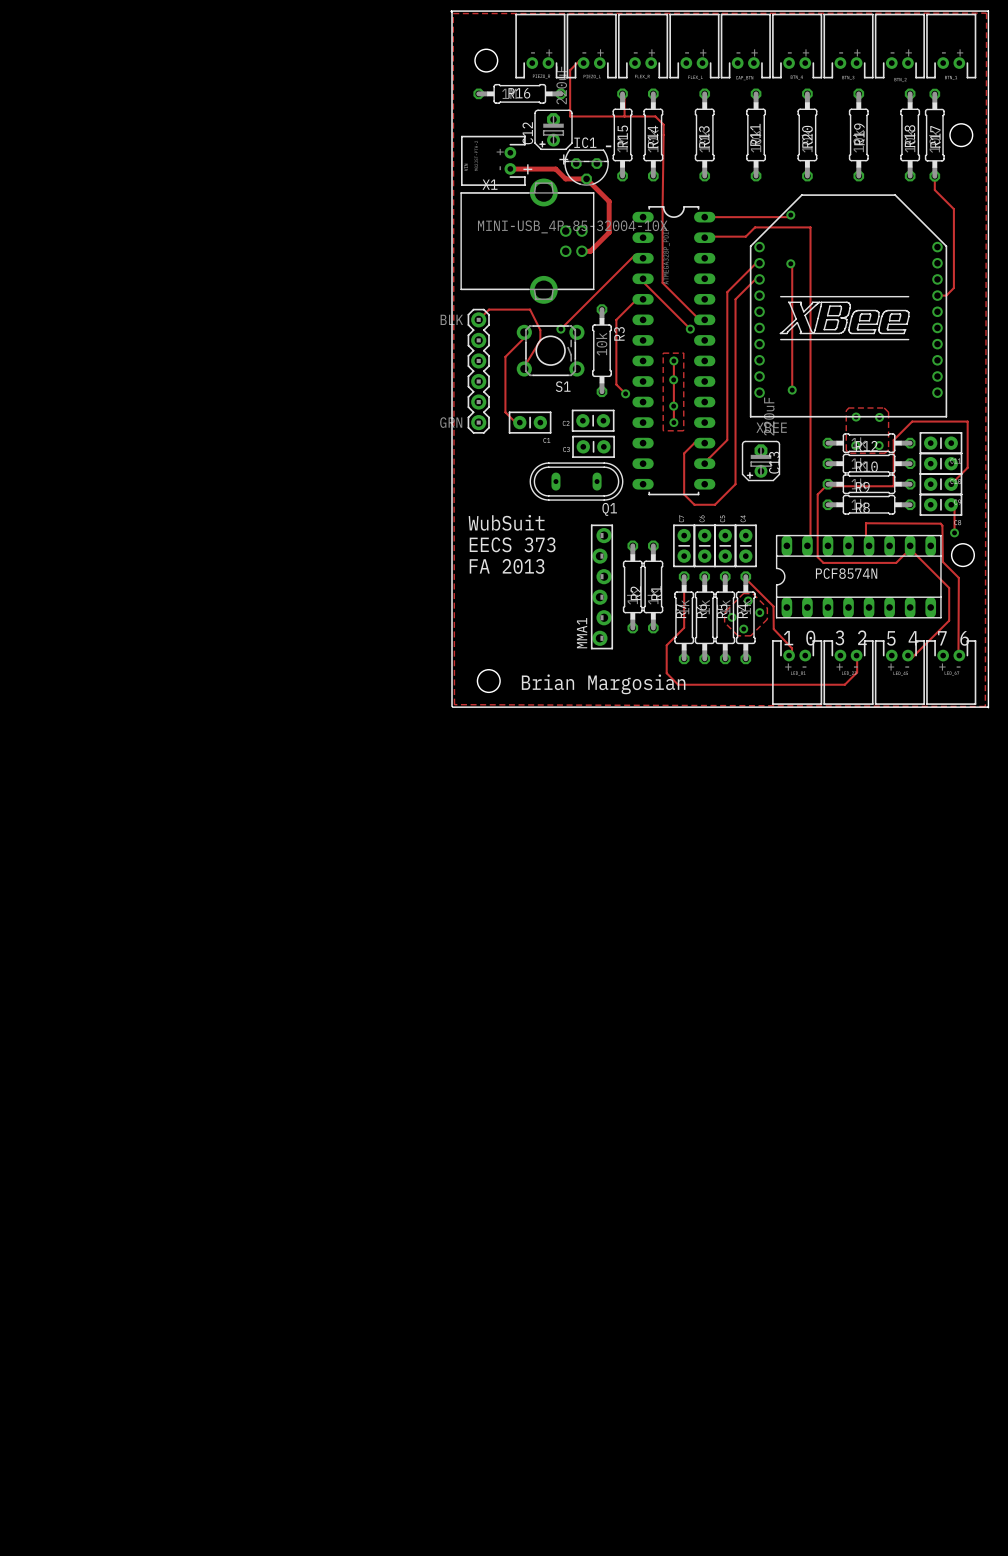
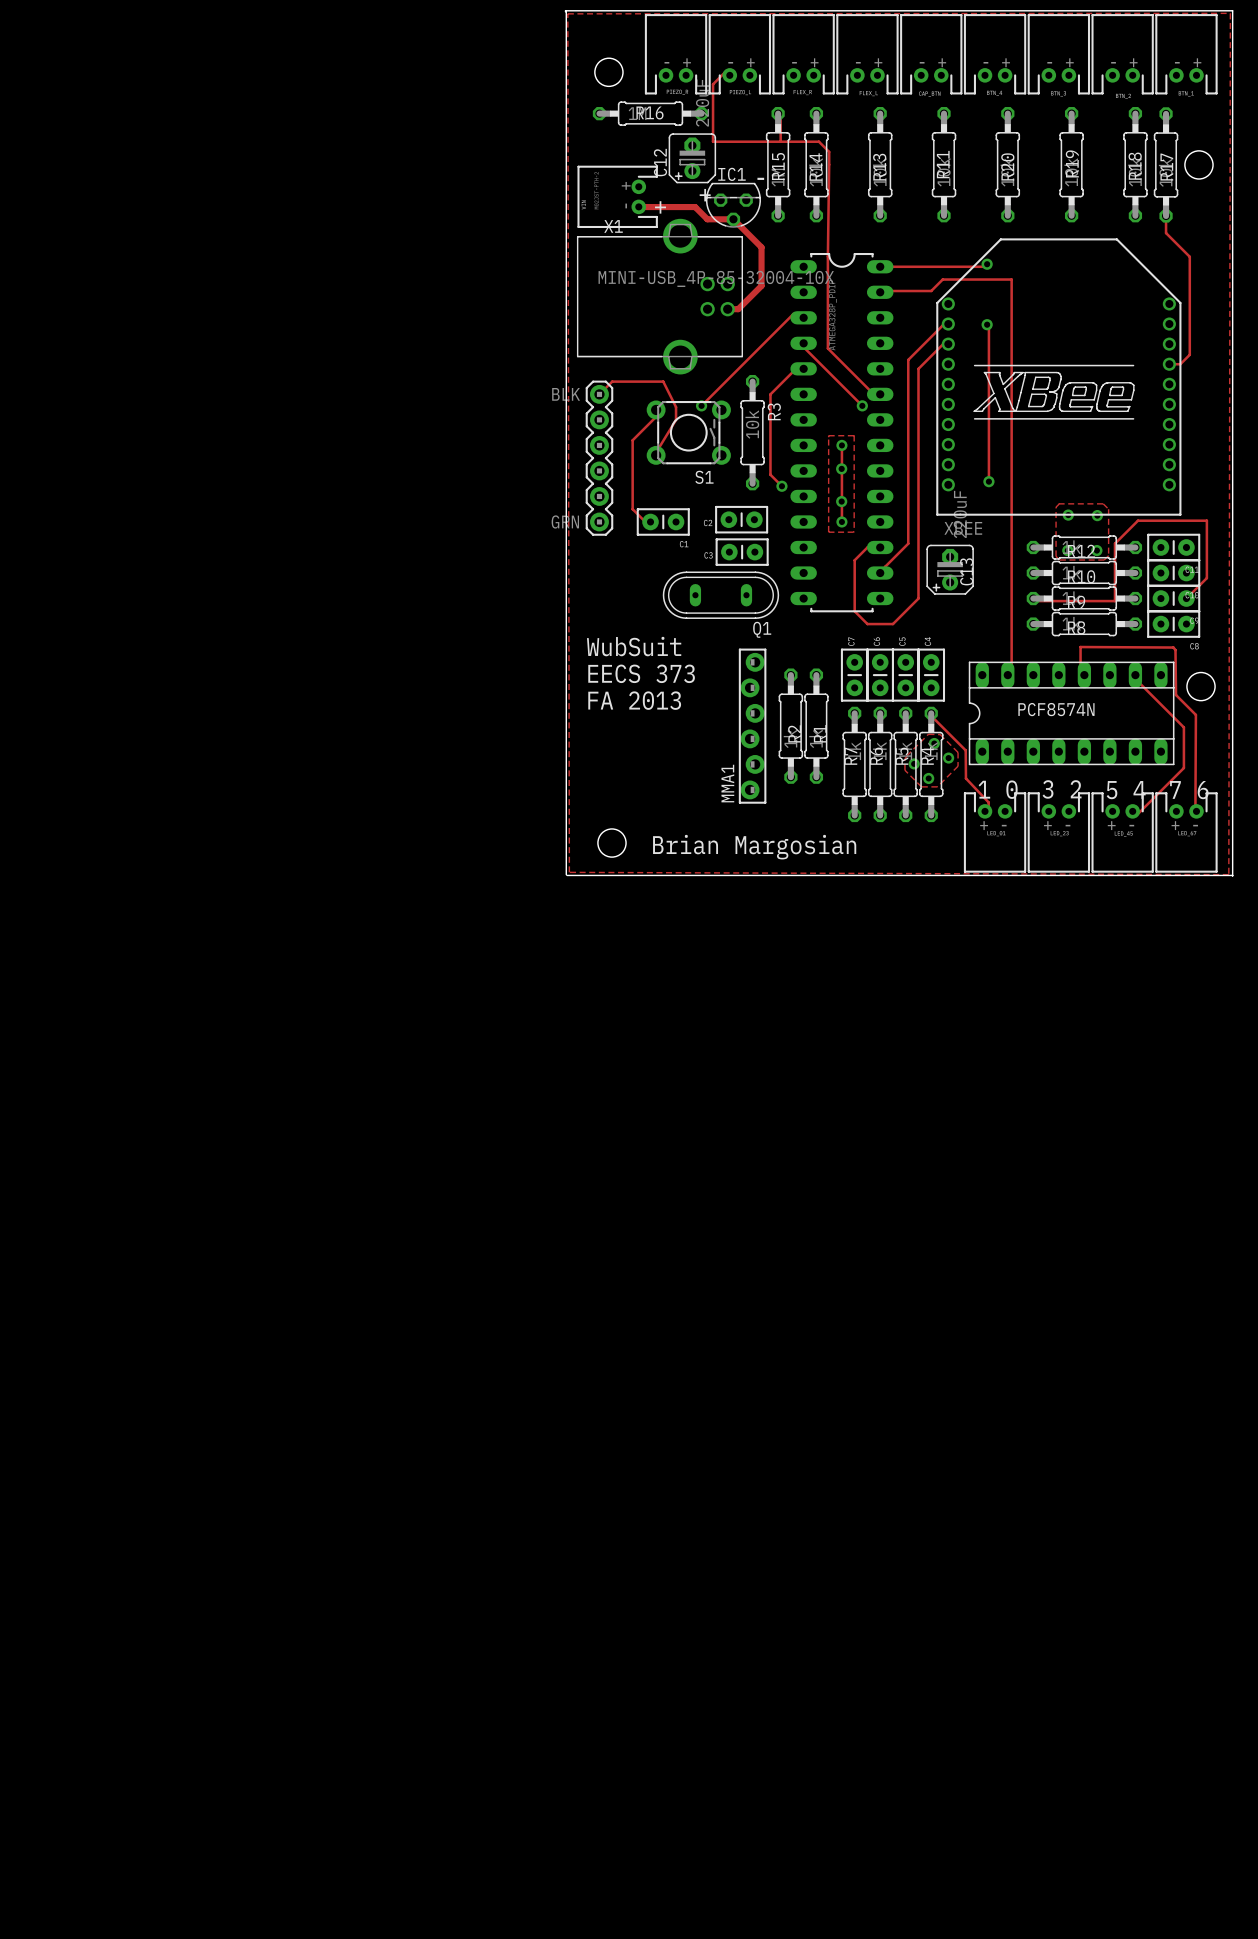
track: (827, 484) (817, 494) (817, 557) (823, 562) (896, 562) (910, 548) (910, 545) -> none
track: (951, 504) (954, 508) (954, 532) -> none
via: (954, 532) -> none
track: (684, 576) (684, 627) (666, 645) (666, 673) (678, 684) (844, 684) (857, 672) (856, 655) -> none

